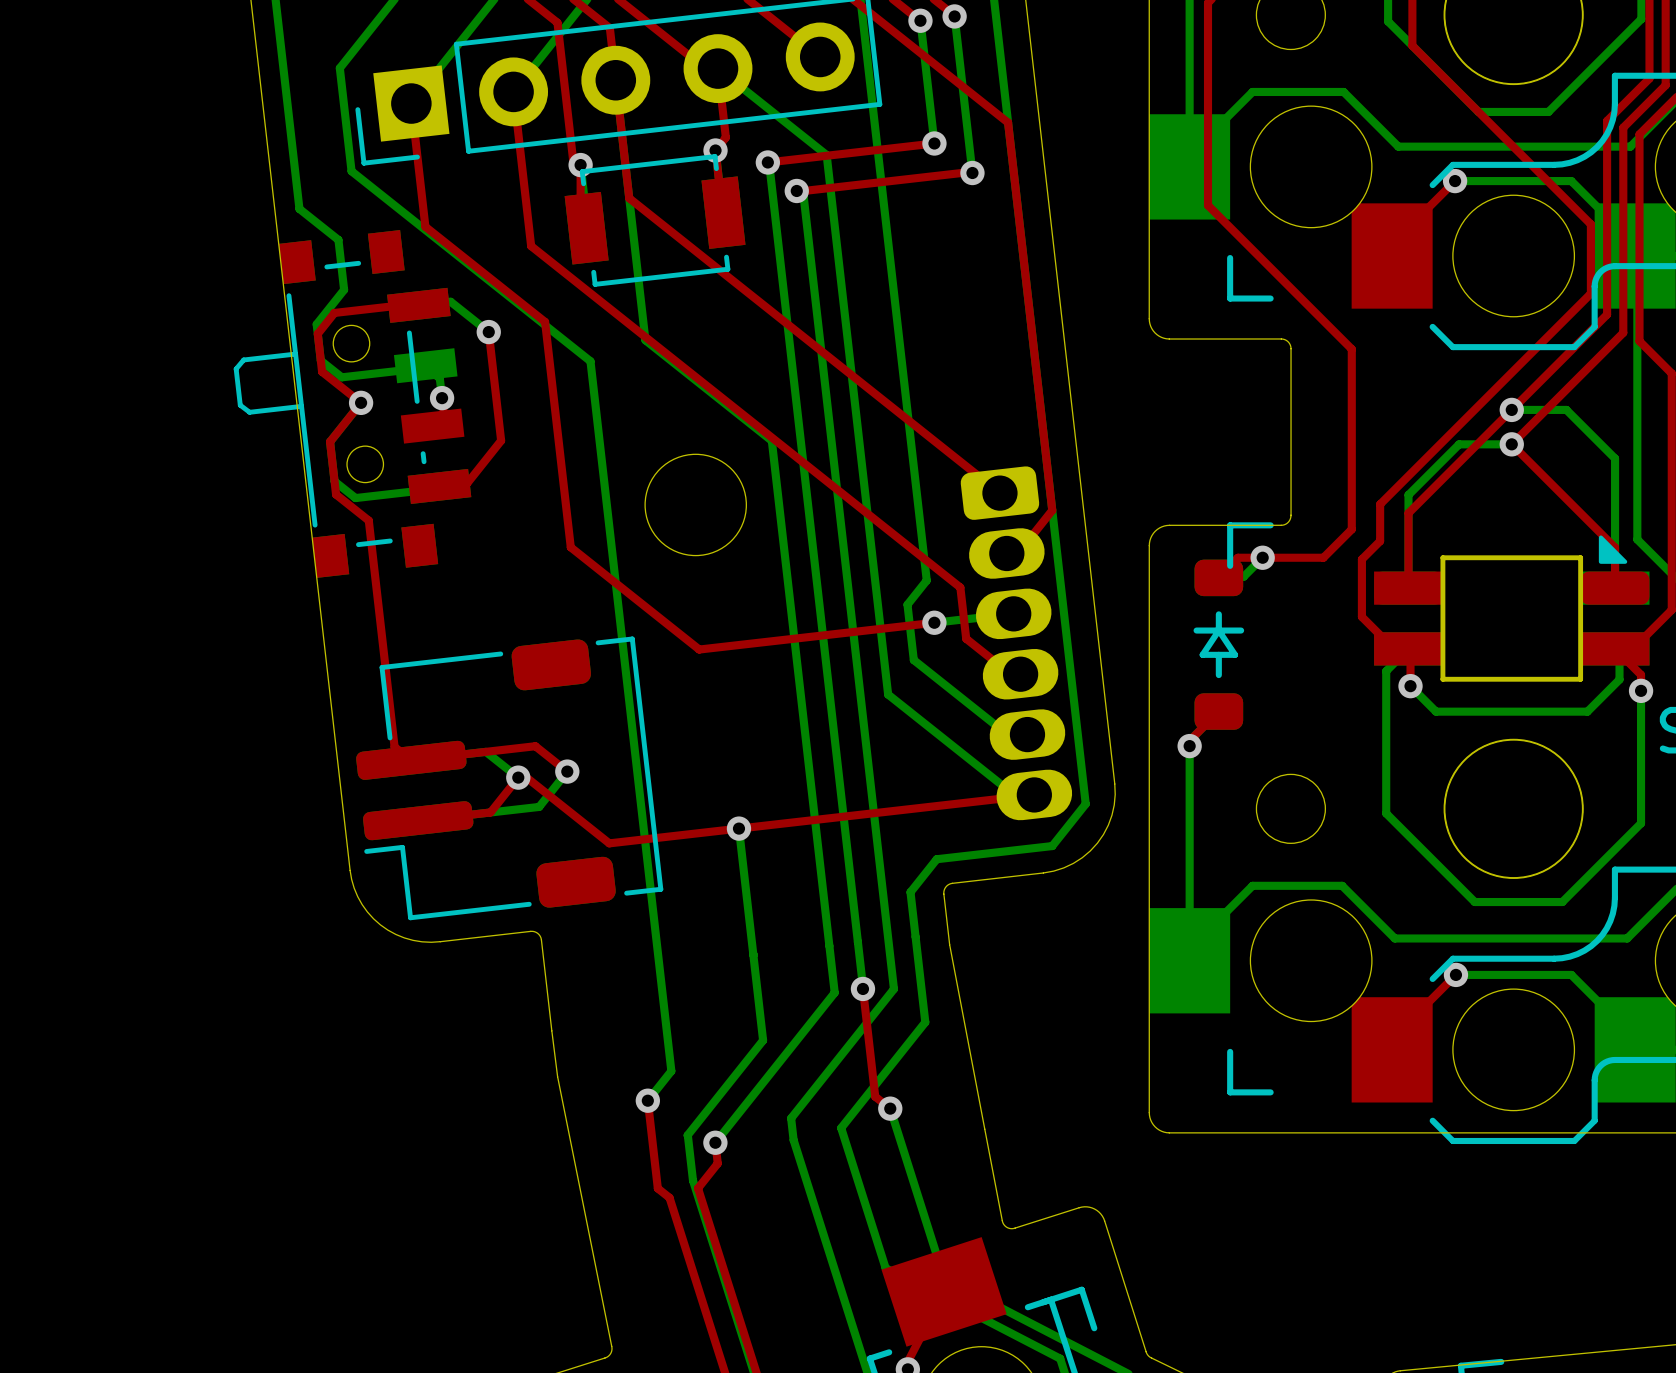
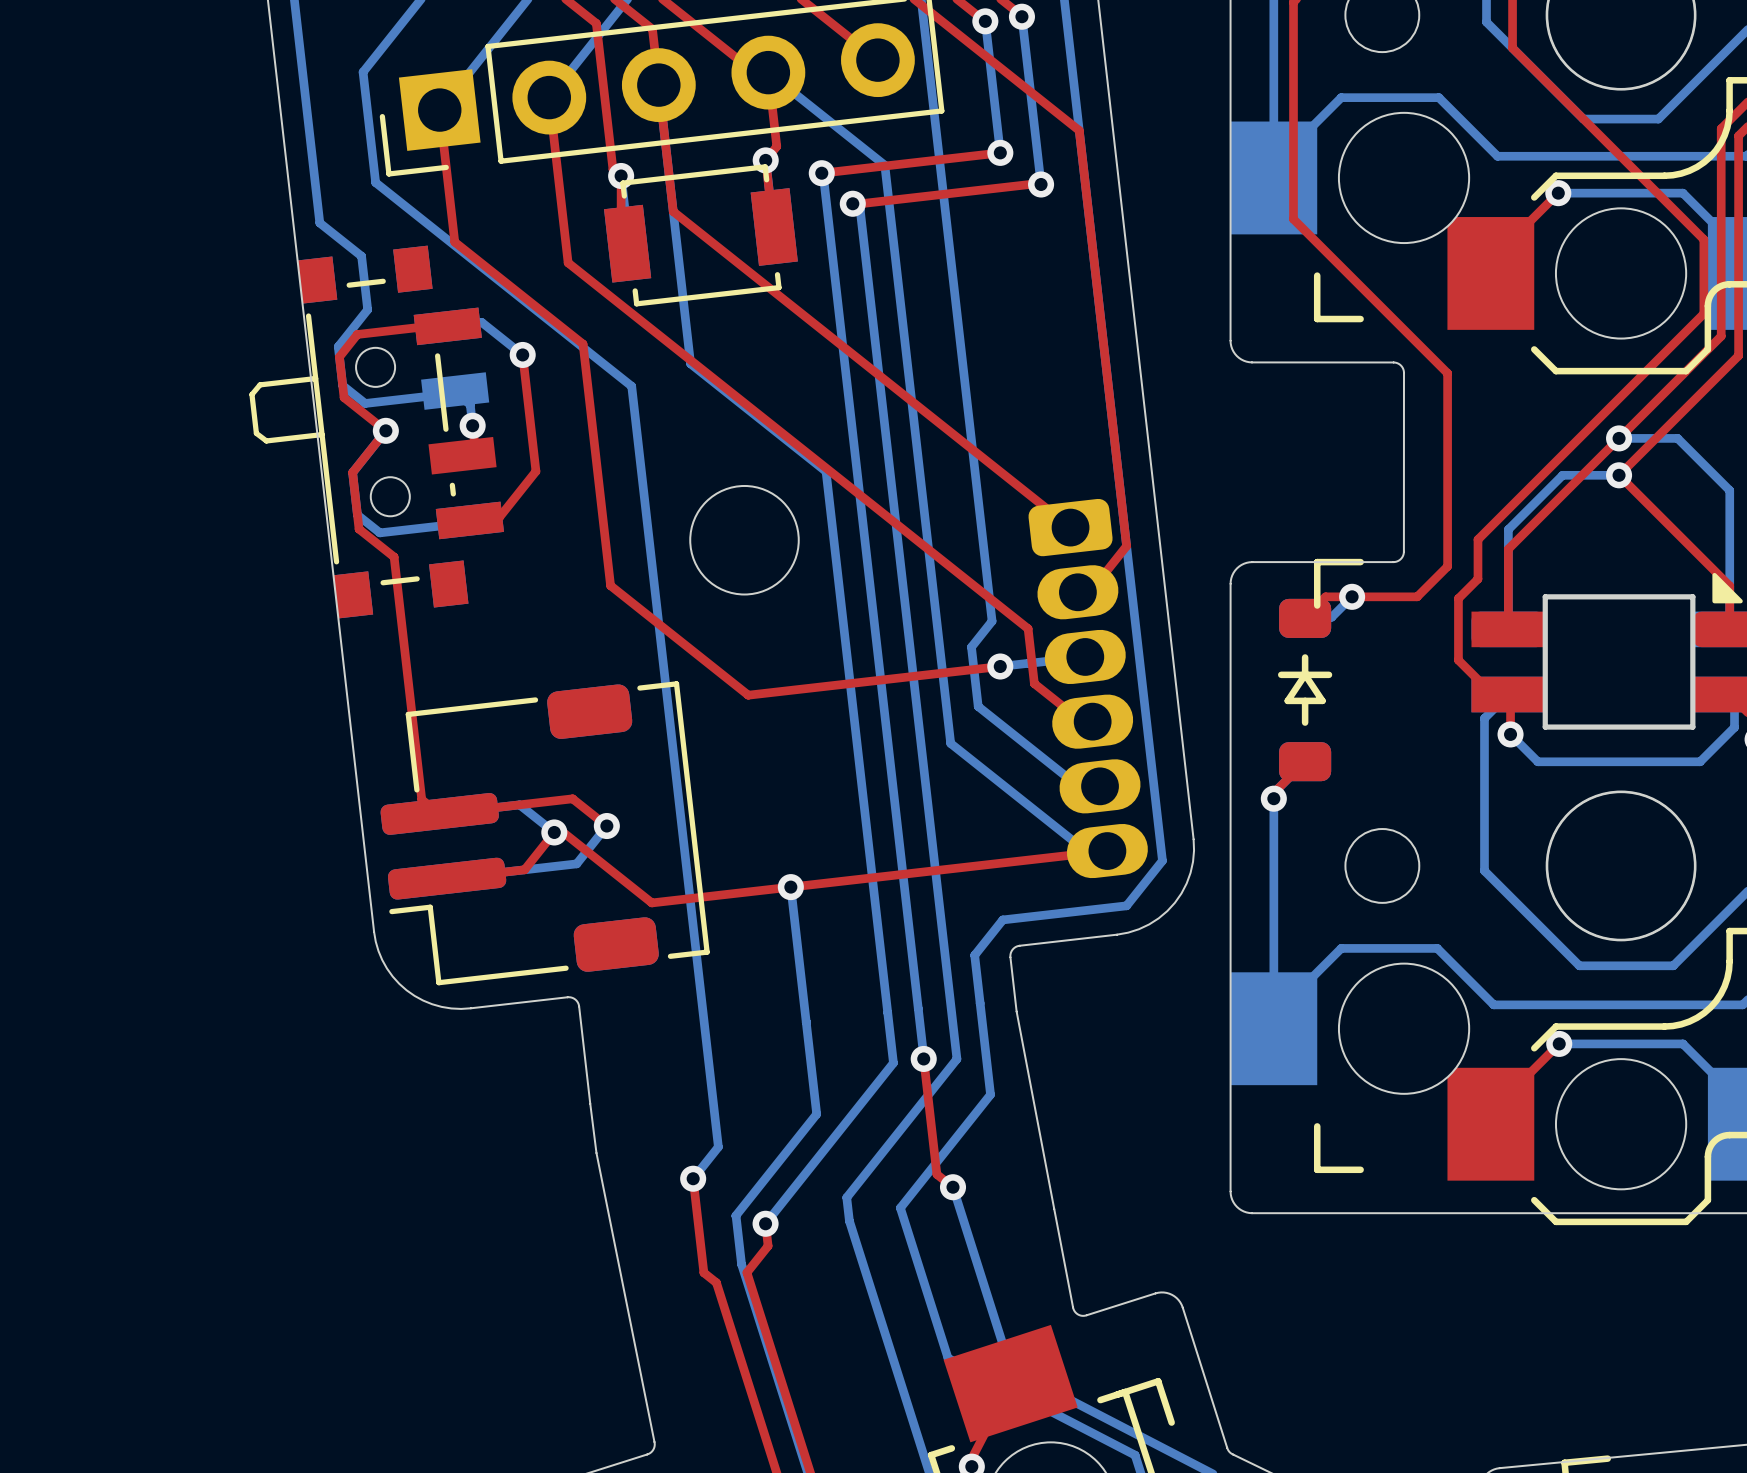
board edge: (1169, 339) (1281, 338) (1289, 342) (1291, 348) (1291, 515) -> (1251, 362) (1393, 362) (1400, 365) (1404, 372) (1403, 551) (1401, 558) (1393, 562) (1252, 562)
board edge: (1290, 515) (1288, 522) (1282, 525) (1169, 525) -> none

